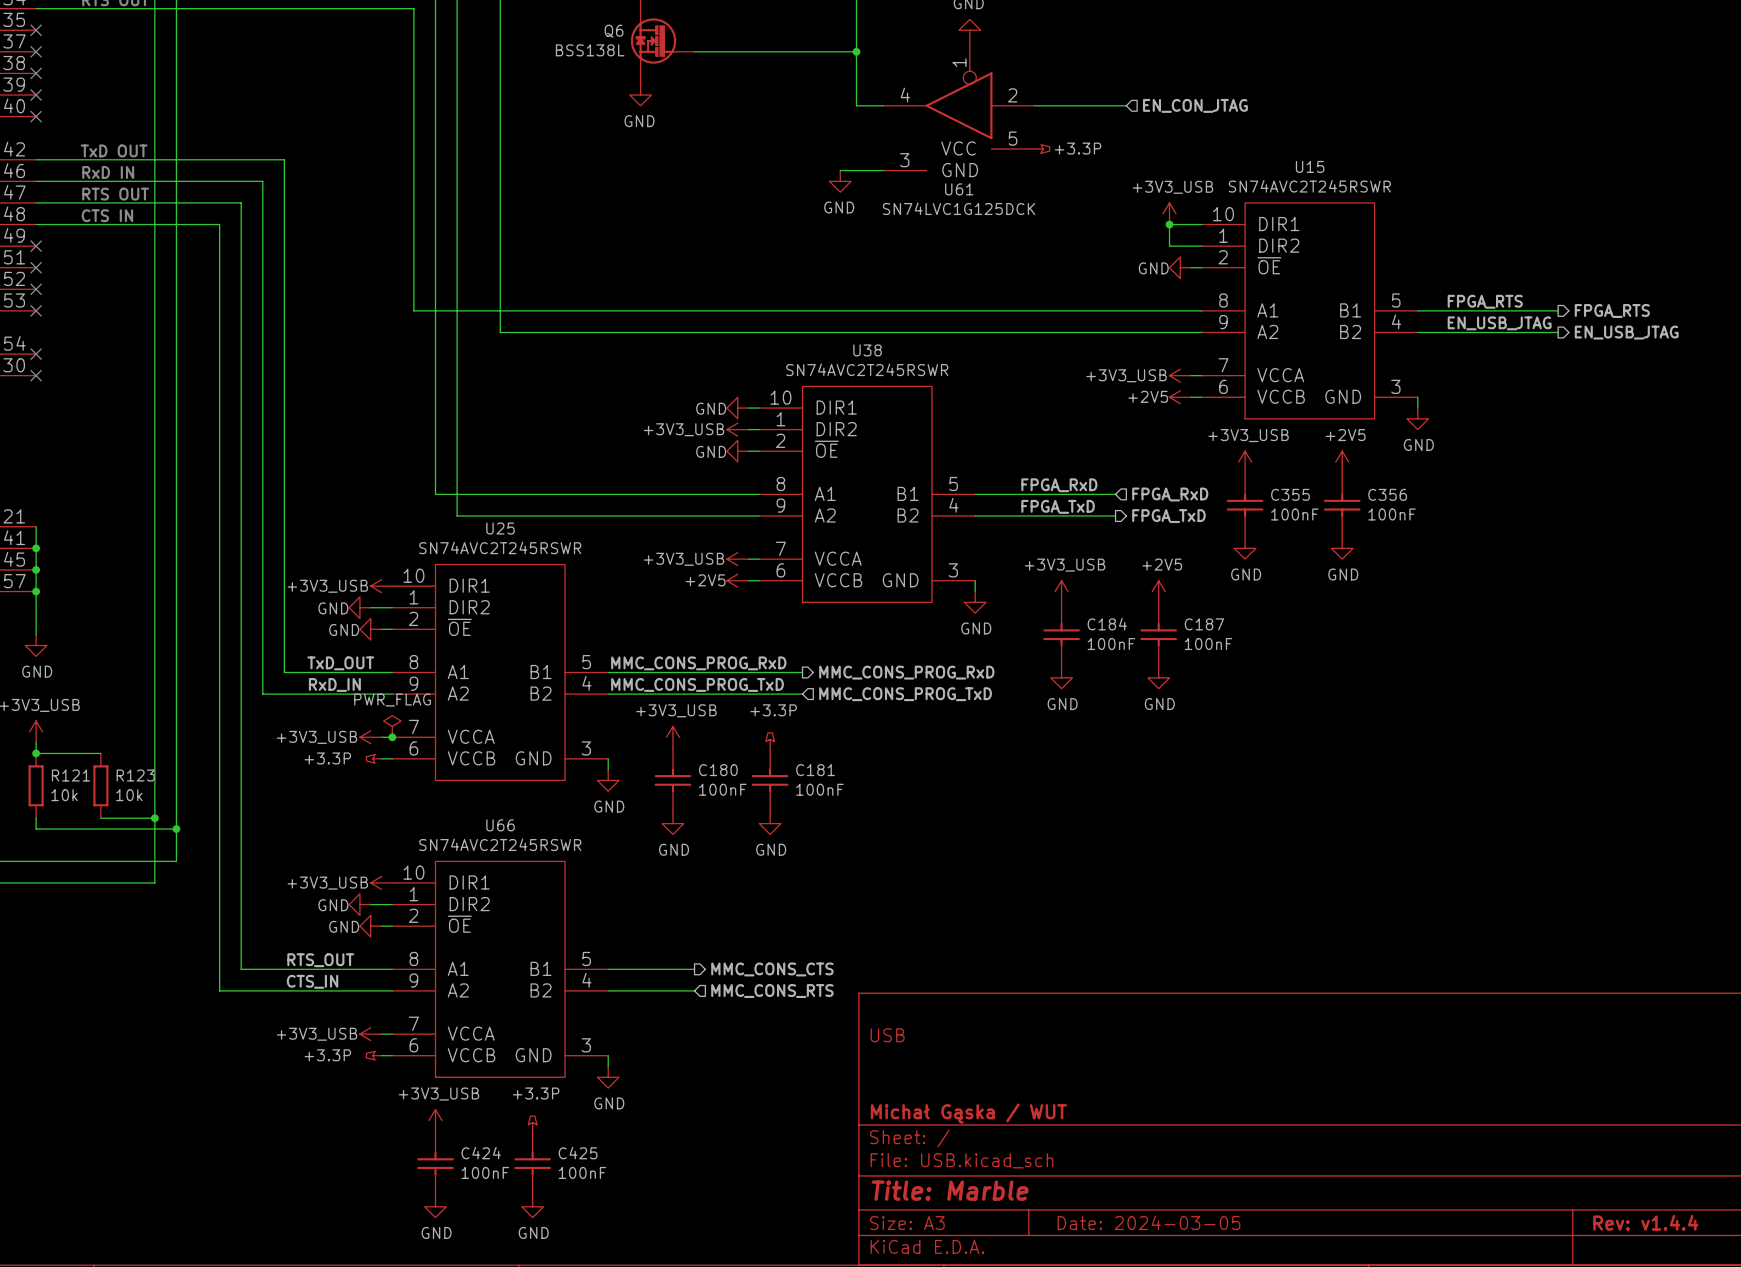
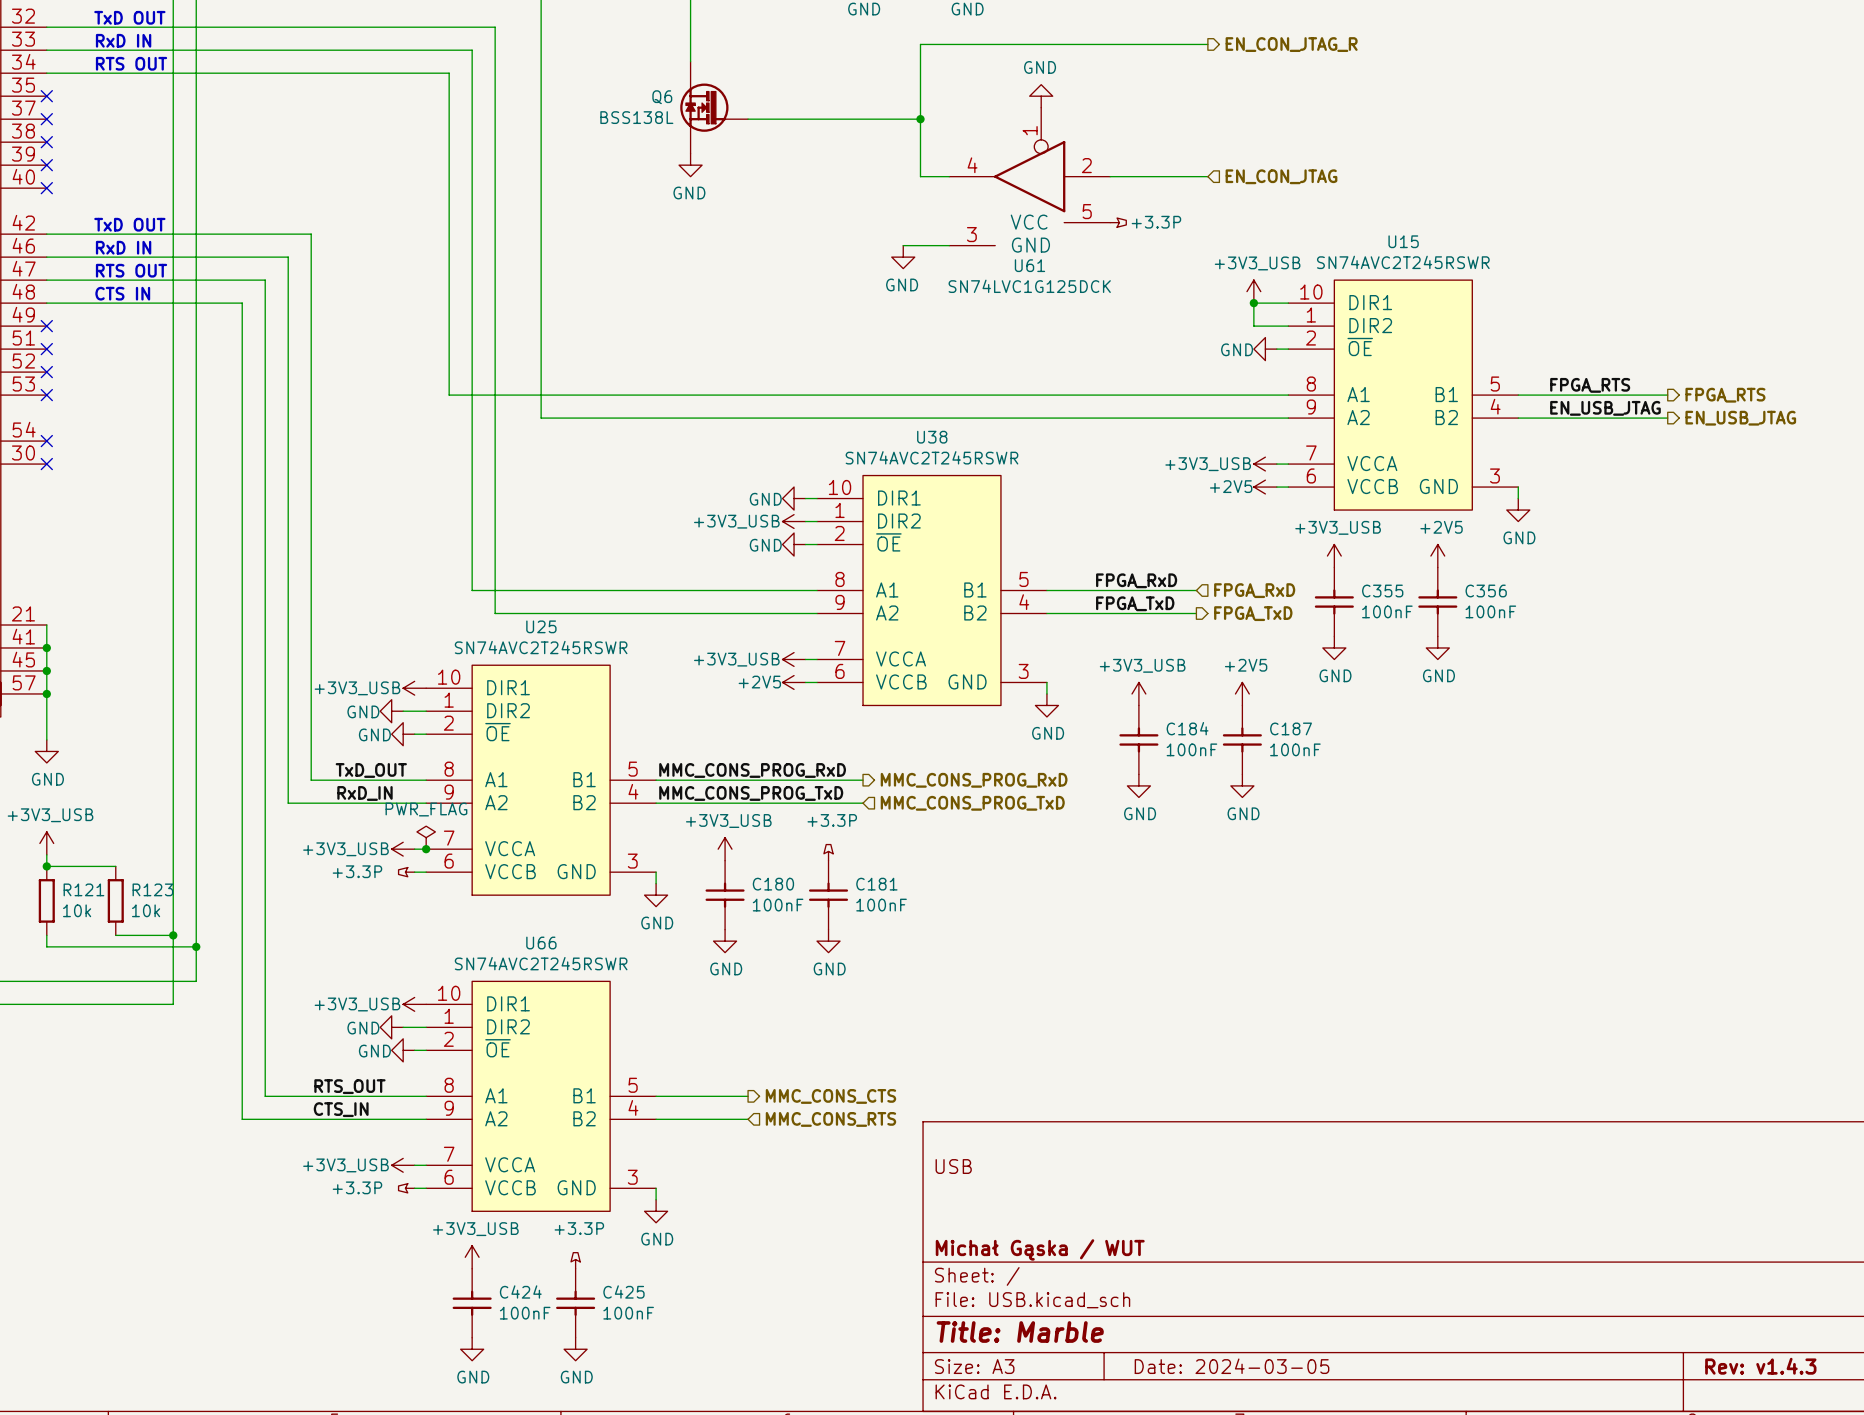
title block: Rev: v1.4.4 (1645, 1222) -> Rev: v1.4.3 (1760, 1366)

